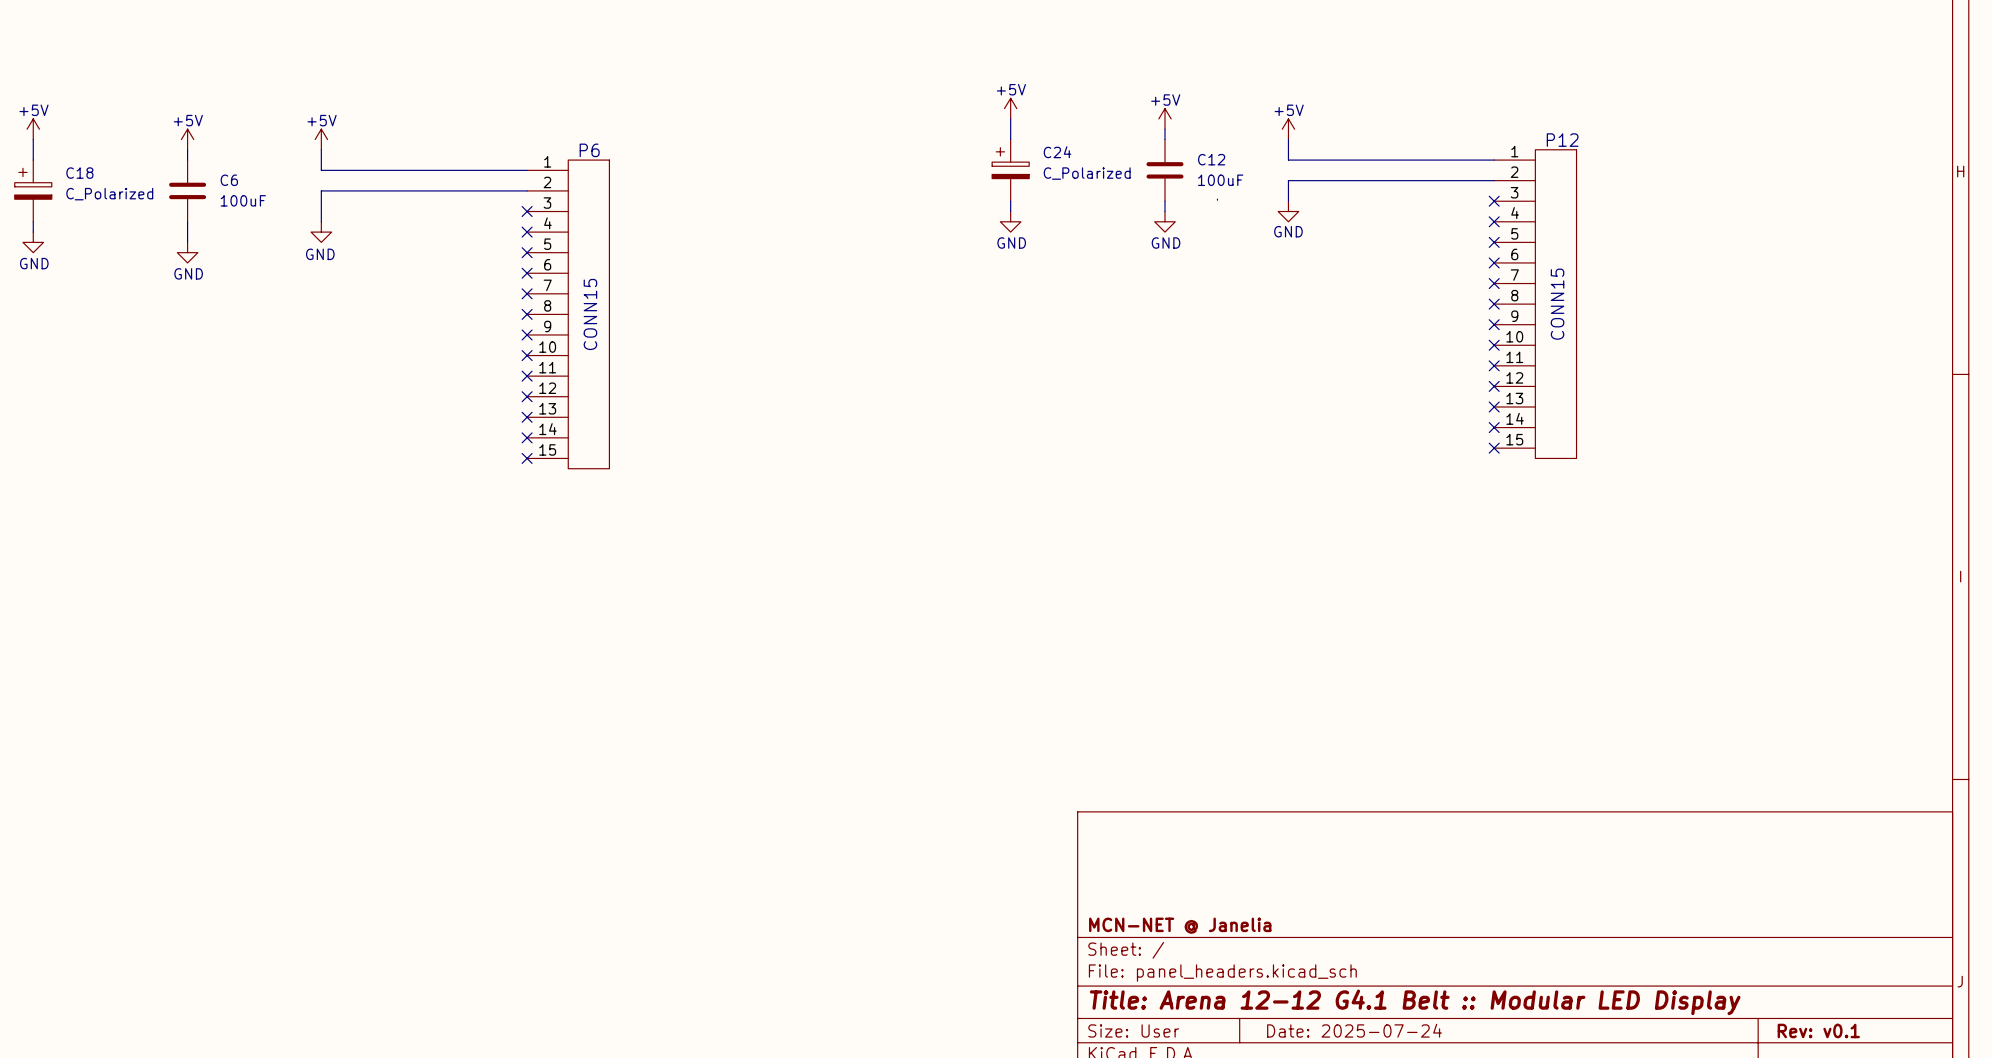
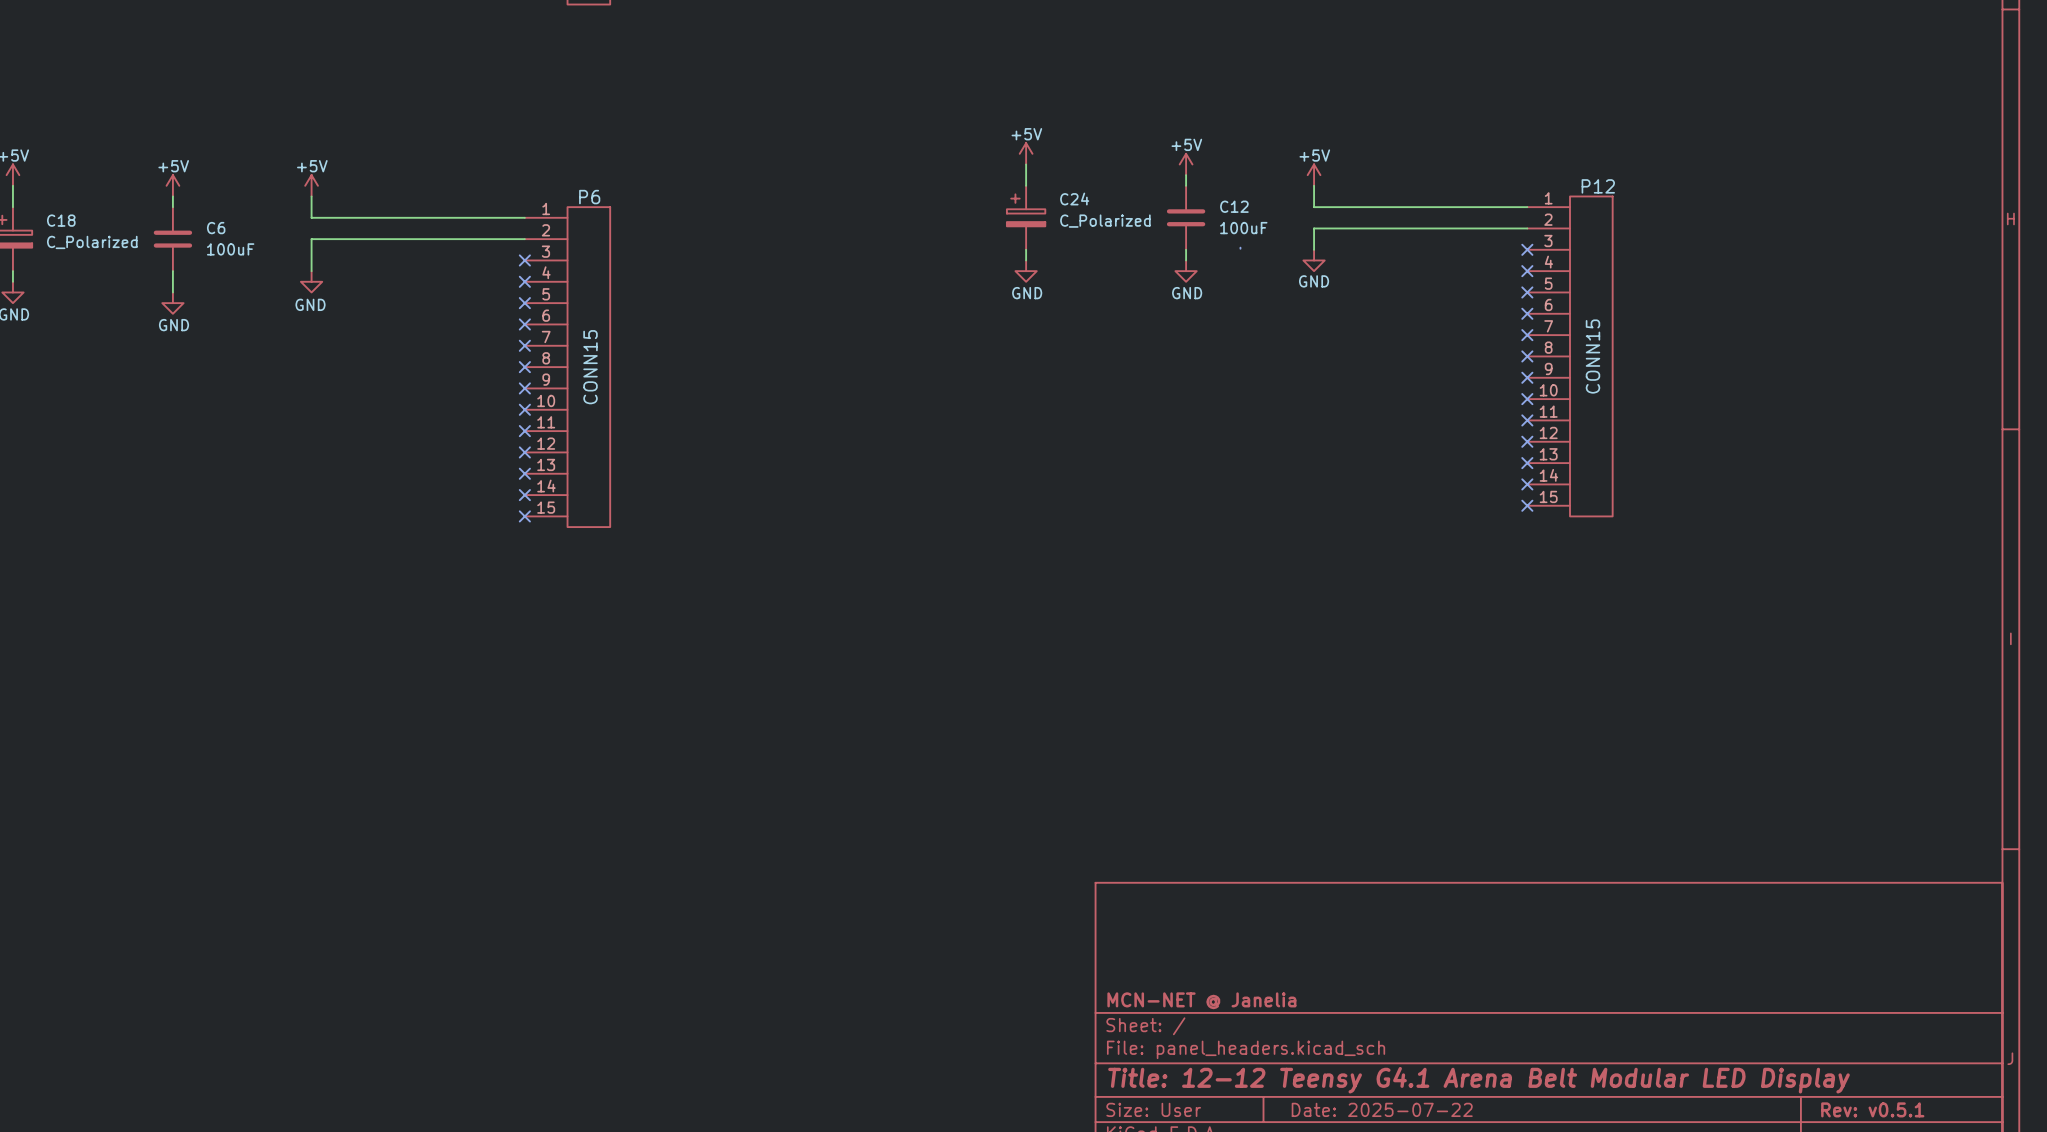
title block: Title: Arena 12-12 G4.1 Belt :: Modular LED Display (1415, 1002) -> Title: 12-12 Teensy G4.1 Arena Belt Modular LED Display (1478, 1080)
title block: Date: 2025-07-24 (1354, 1030) -> Date: 2025-07-22 (1382, 1109)
title block: Rev: v0.1 (1818, 1030) -> Rev: v0.5.1 (1872, 1109)

